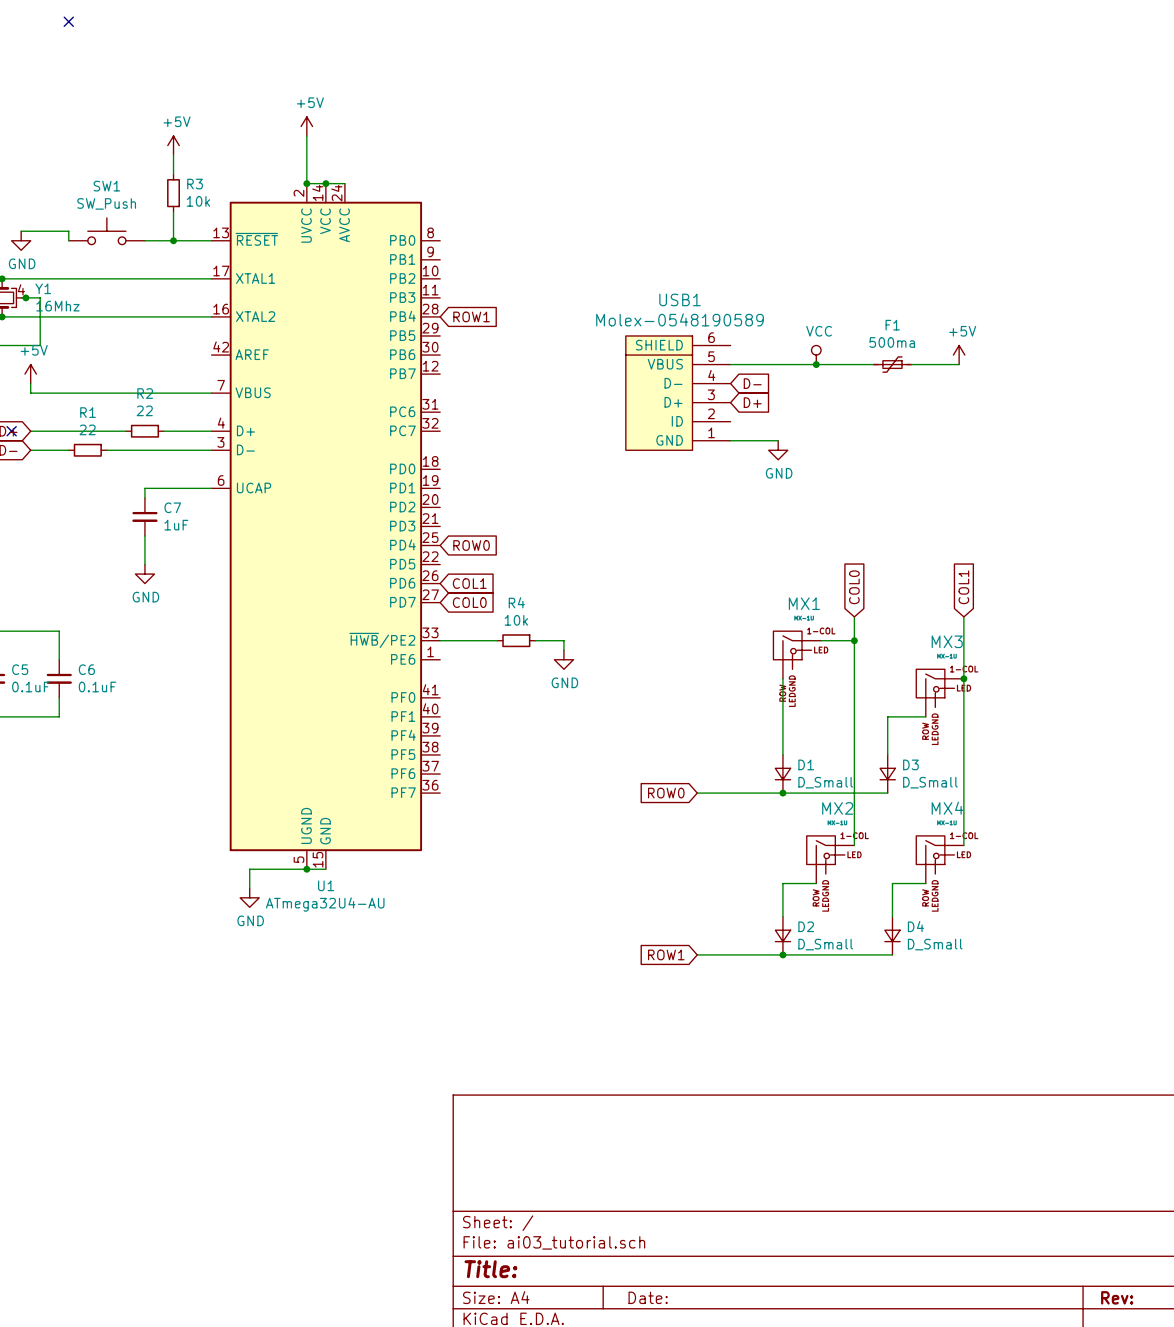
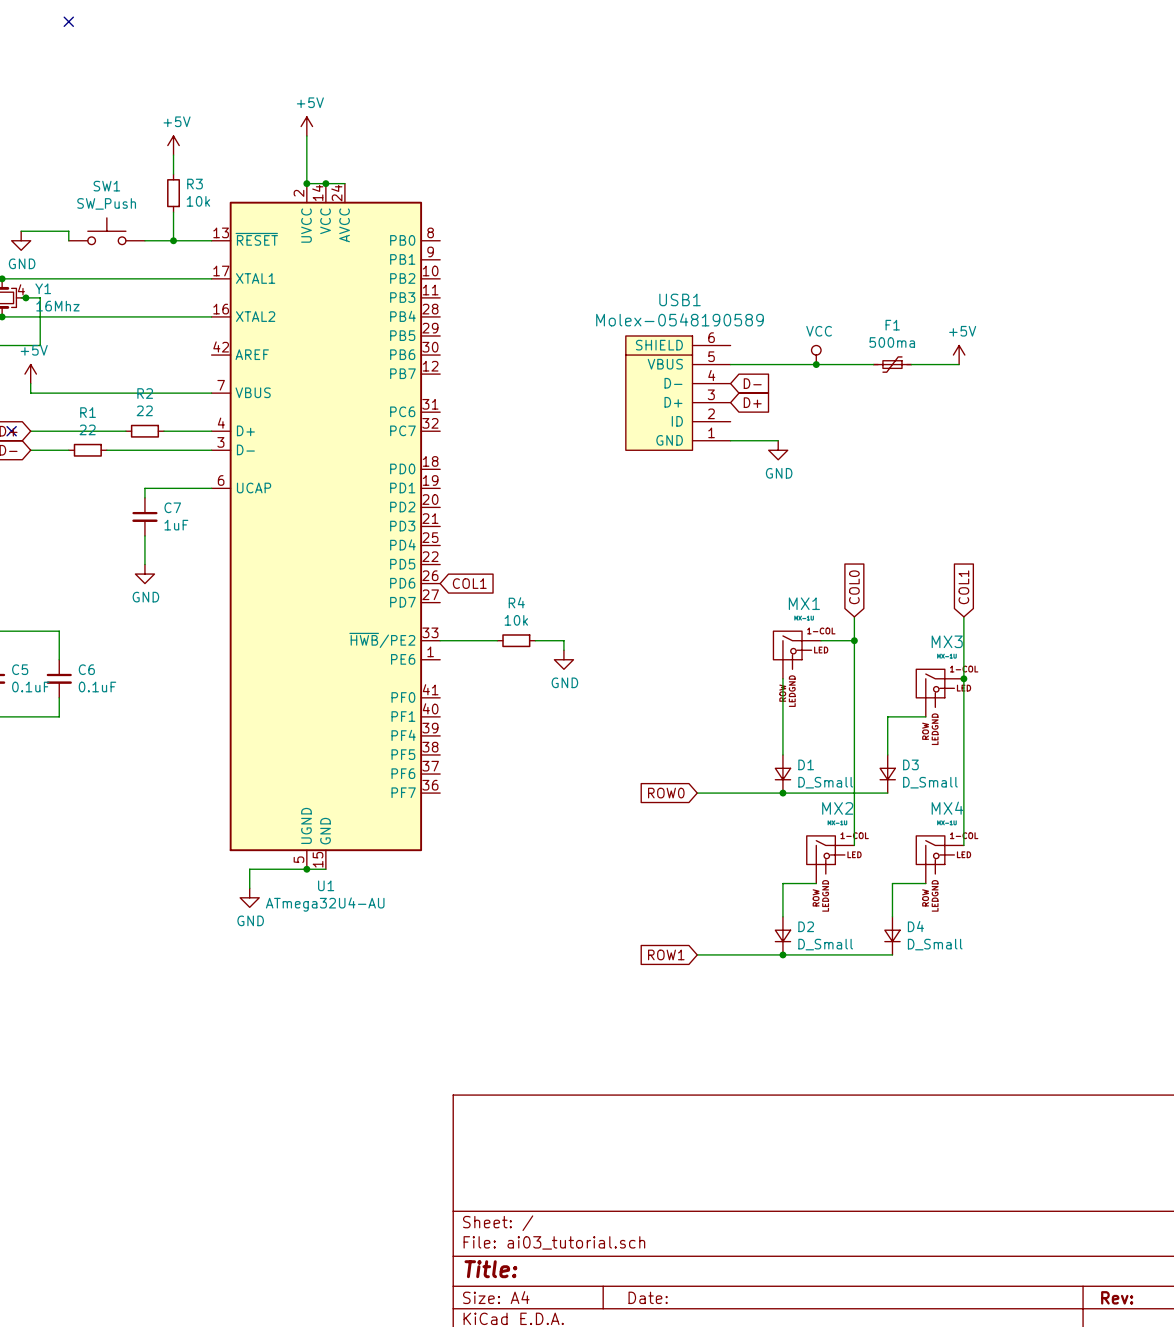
global label: ROW1 (471, 316) -> none
global label: ROW0 (471, 545) -> none
global label: COL0 (469, 602) -> none

